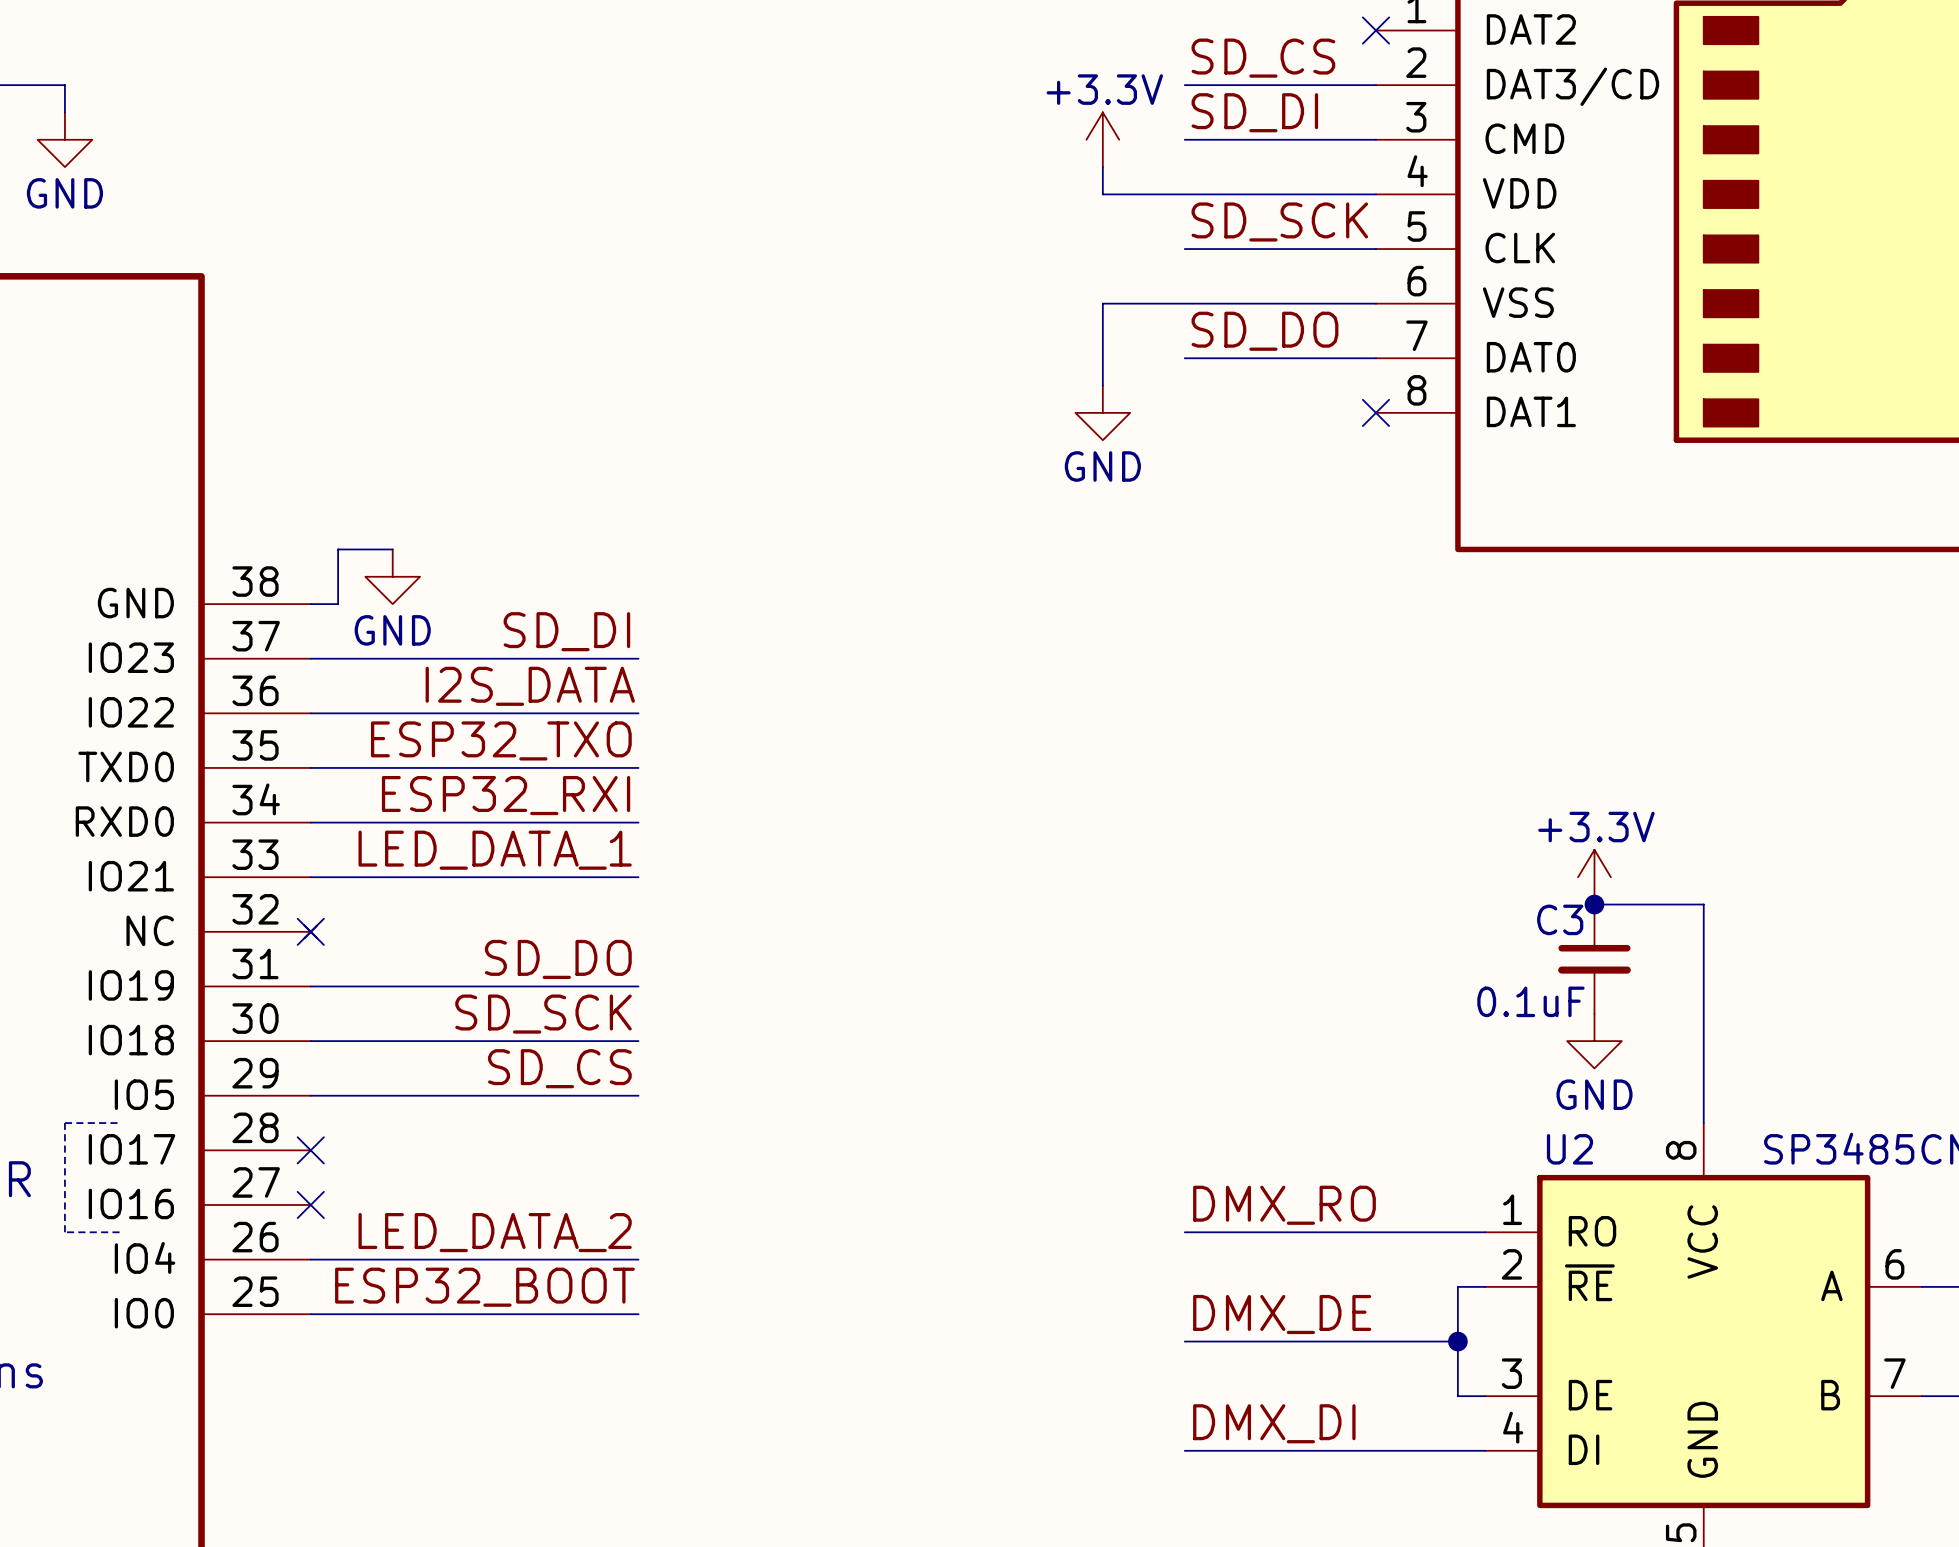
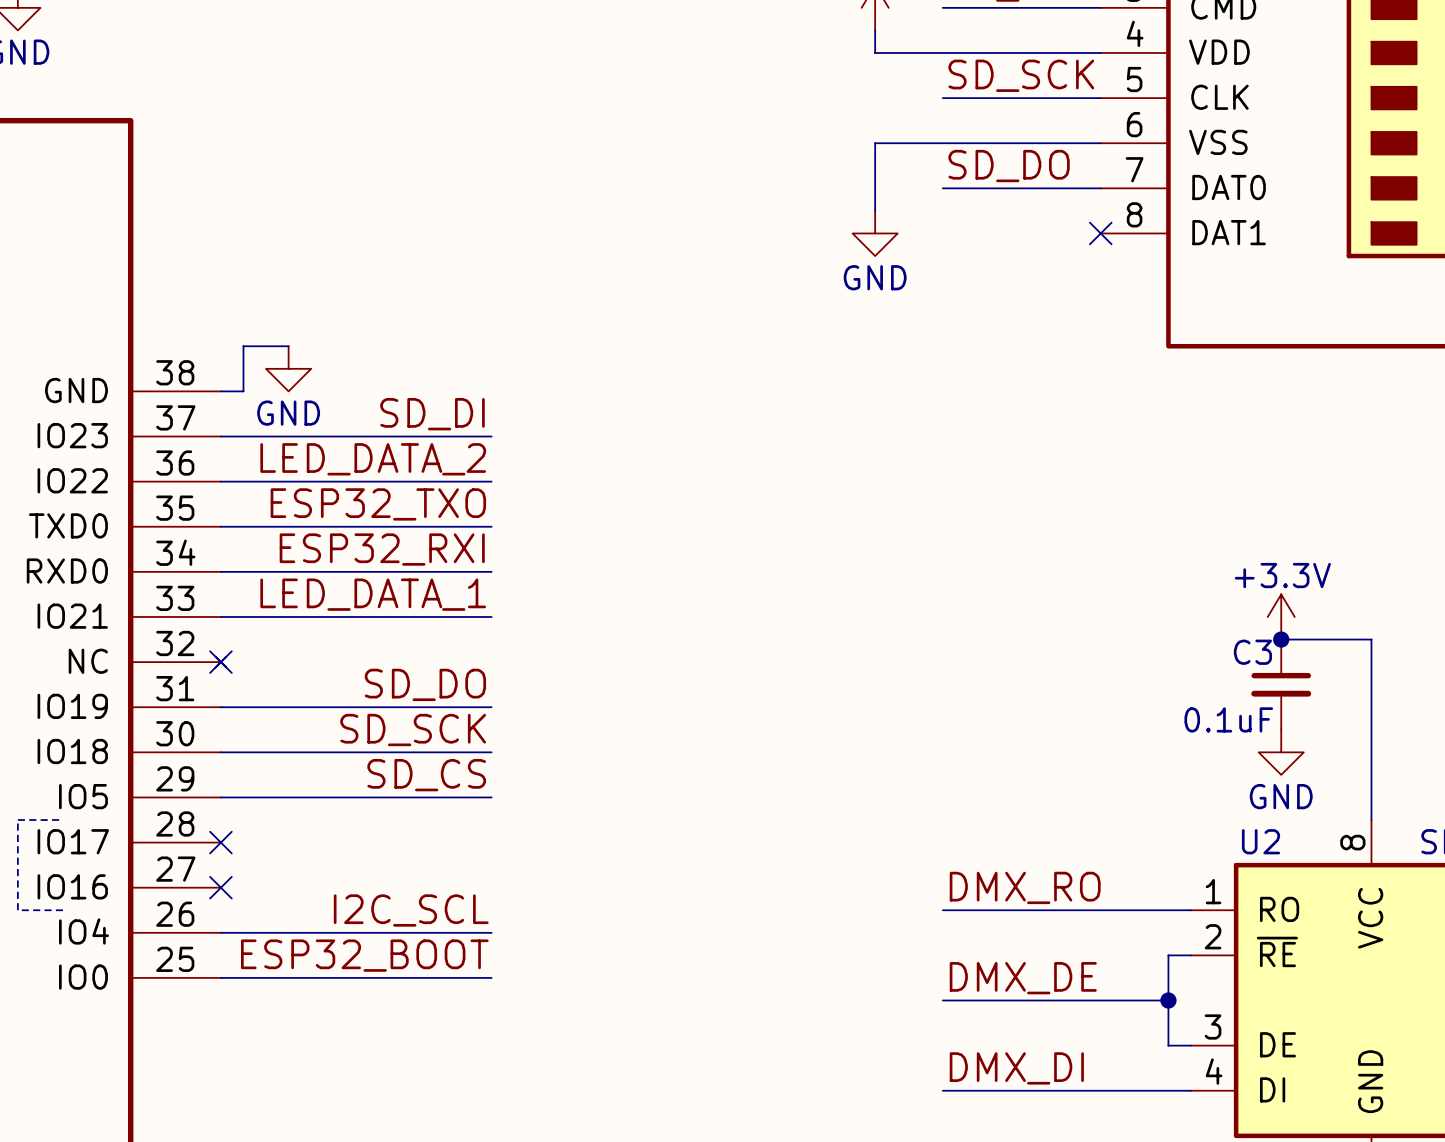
label: I2S_DATA (530, 686) -> LED_DATA_2 (373, 459)
label: LED_DATA_2 (495, 1232) -> I2C_SCL (411, 910)

